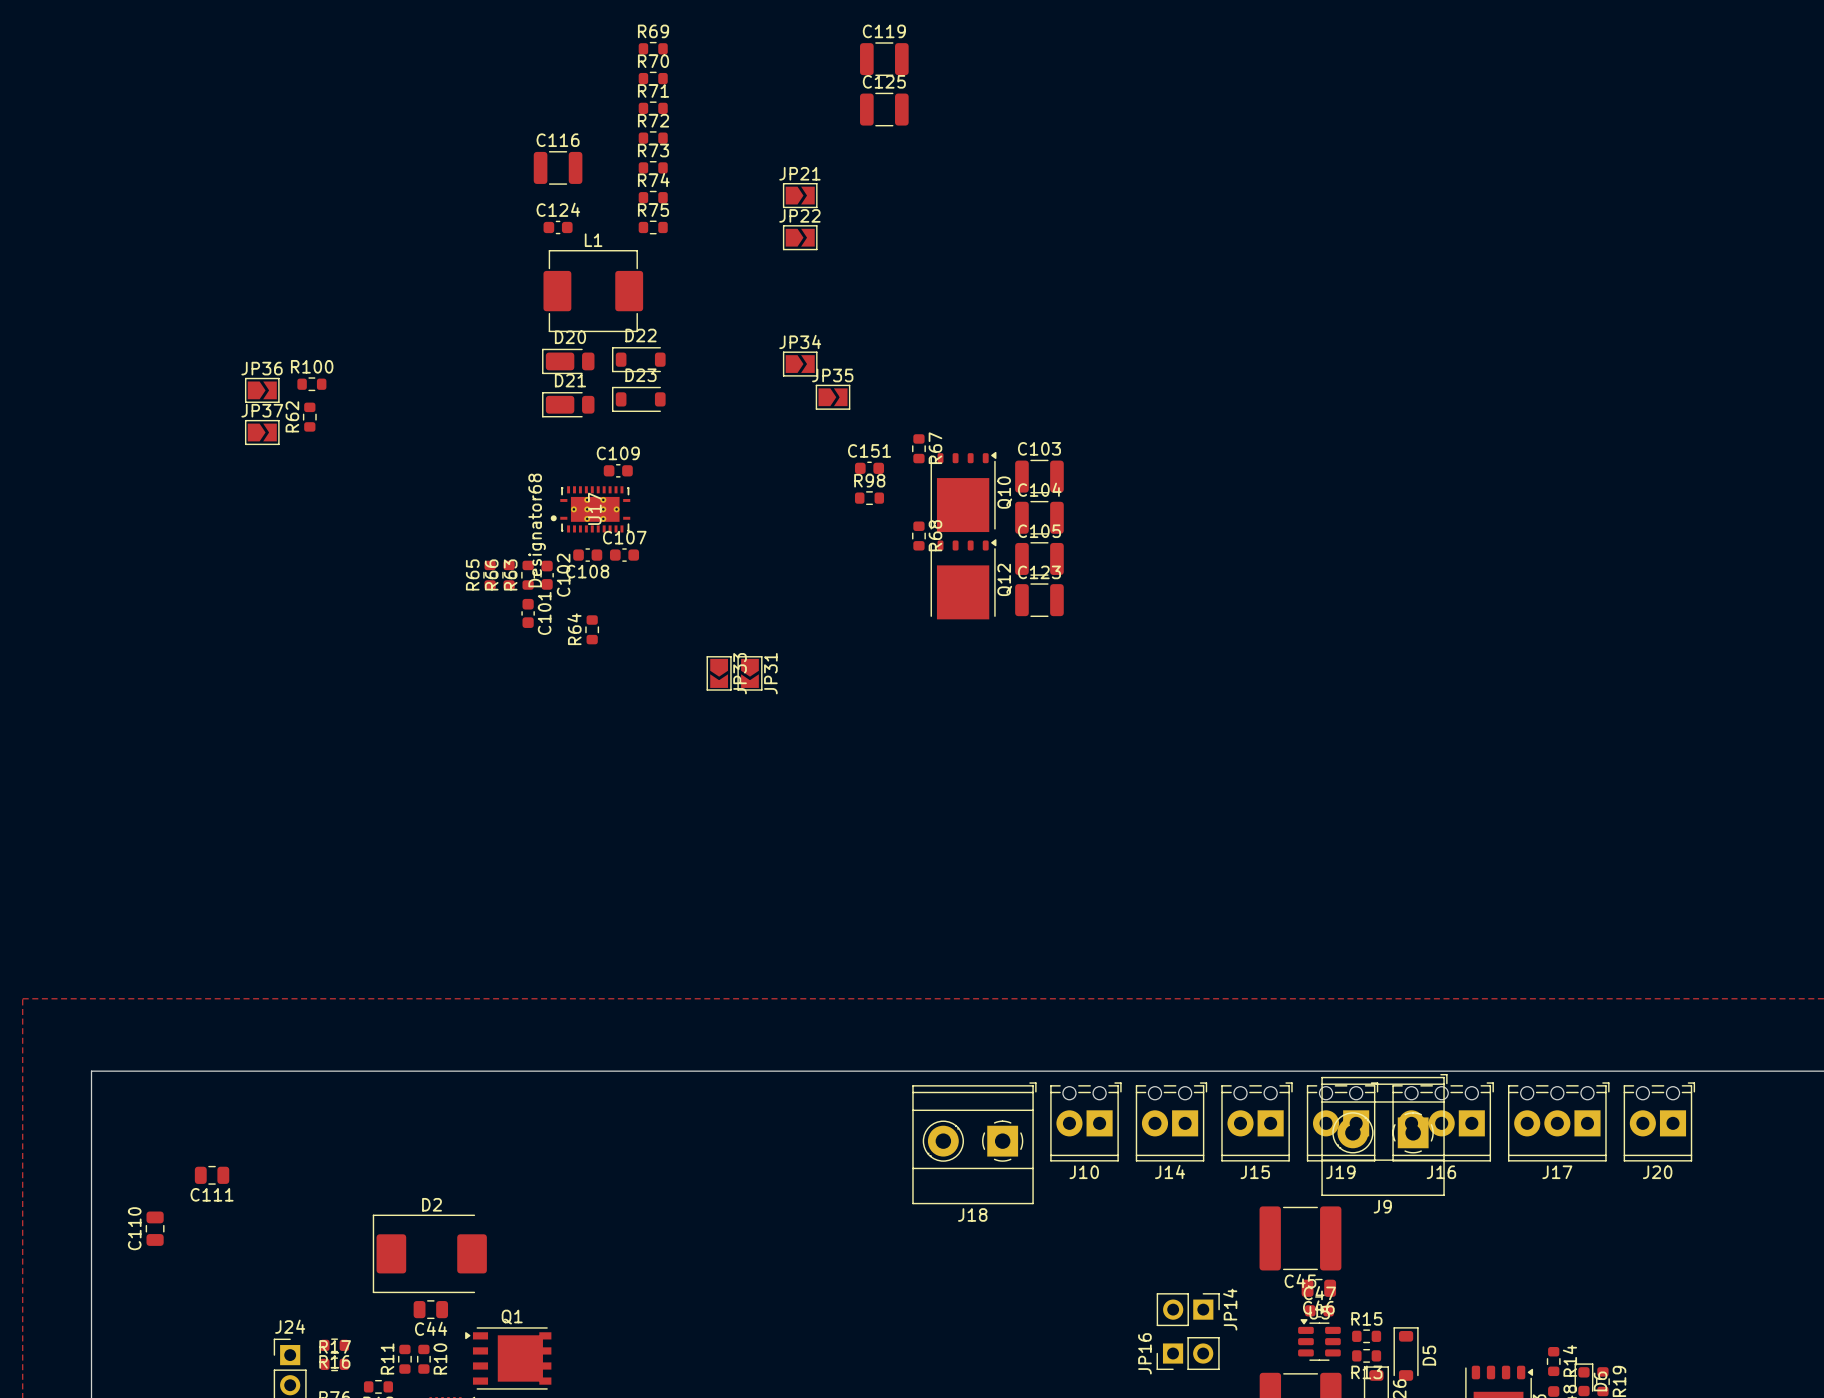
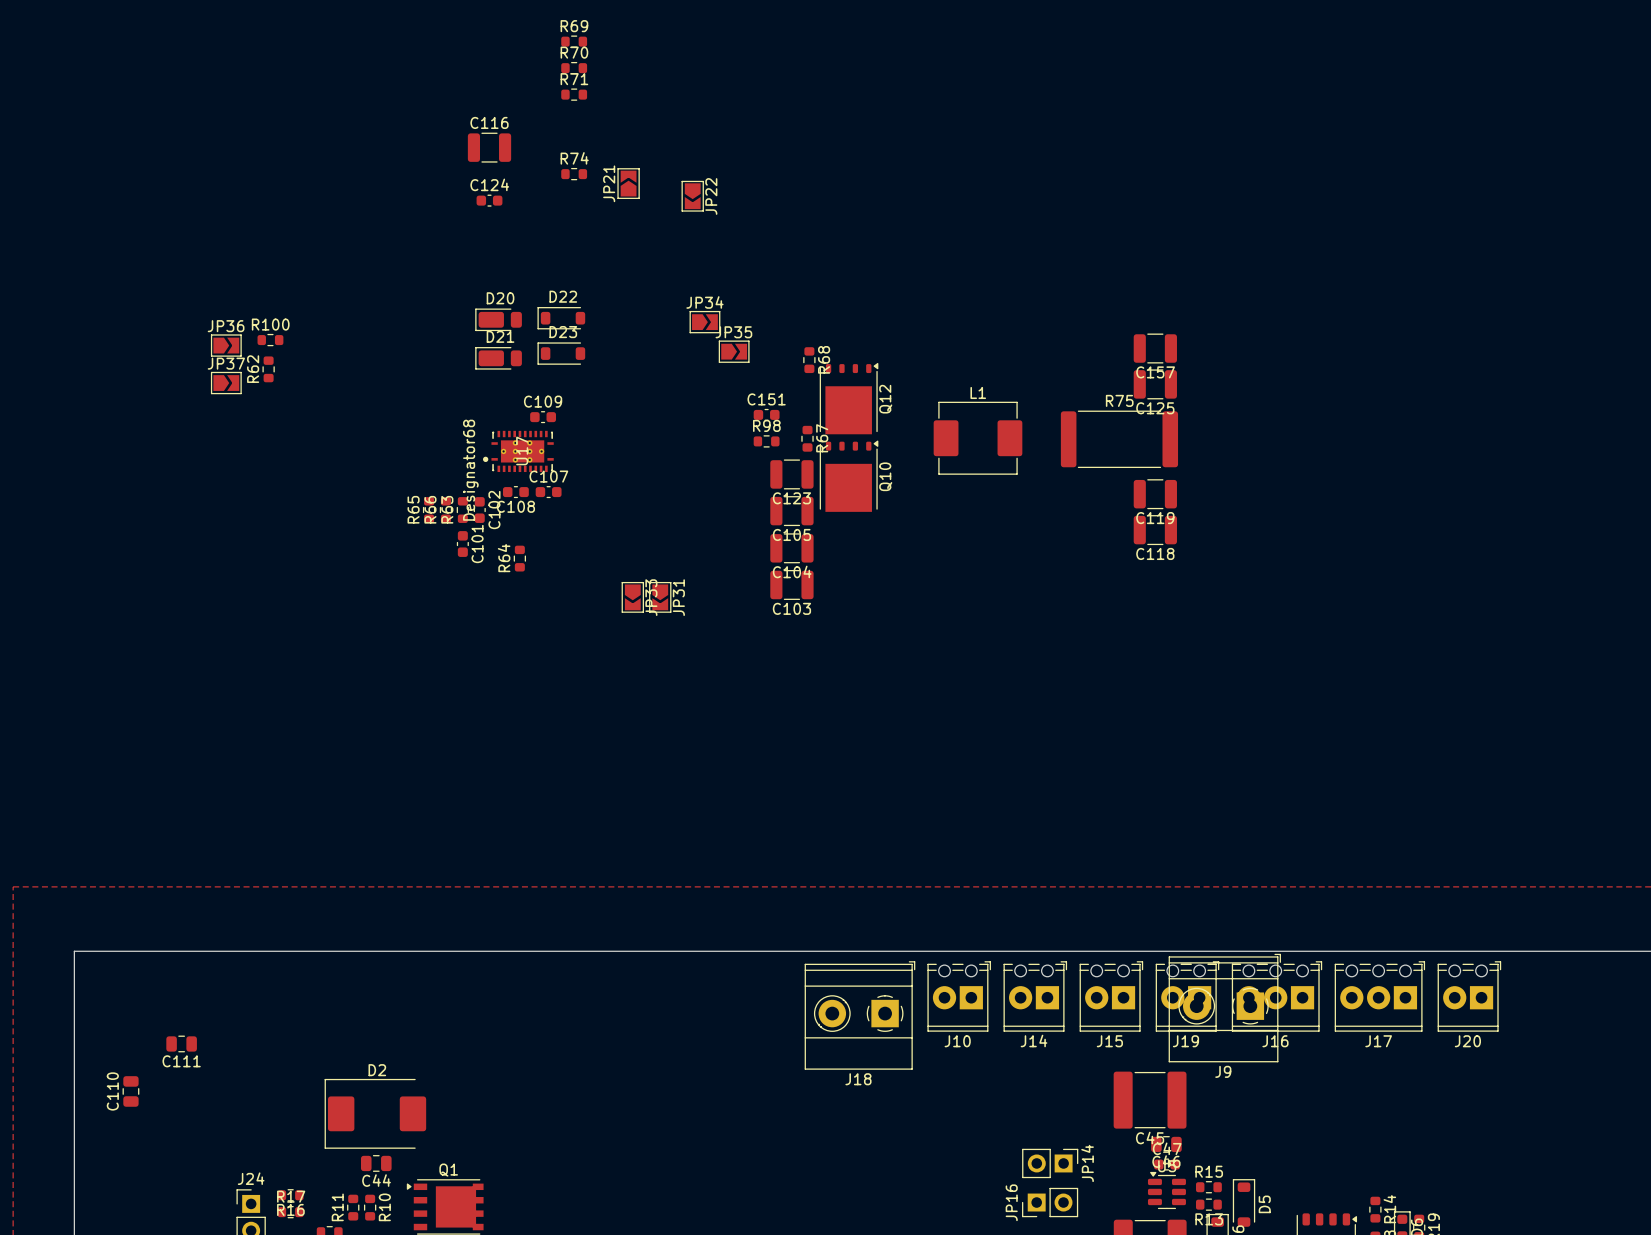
C119 name position: C119 (884, 31) -> C119 (1155, 518)
C119 position: (884, 59) -> (1155, 494)
C125 name position: C125 (884, 81) -> C125 (1155, 408)
C125 position: (884, 109) -> (1155, 384)
R72: (653, 138) -> none
R73: (653, 167) -> none
JP21 rotation: 0° (800, 195) -> 90° counterclockwise (628, 183)
JP21 position: (800, 195) -> (628, 183)
R75 name position: R75 (653, 210) -> R75 (1119, 400)
R75 footprint: [638, 220, 668, 235] -> [1060, 410, 1179, 469]
JP22 rotation: 0° (800, 237) -> 90° clockwise (692, 196)
L1 position: (593, 291) -> (978, 438)
C157: none -> (1155, 348)
R67 position: (918, 448) -> (807, 438)
C103 name position: C103 (1039, 448) -> C103 (791, 608)
C103 position: (1039, 476) -> (791, 584)
C104 name position: C104 (1039, 489) -> C104 (792, 571)
Q10 position: (963, 491) -> (849, 476)
C104 position: (1039, 517) -> (791, 548)
C105 name position: C105 (1039, 531) -> C105 (791, 534)
R68 position: (918, 536) -> (809, 360)
C105 position: (1039, 558) -> (791, 511)
C123 name position: C123 (1039, 572) -> C123 (791, 498)
Q12 position: (963, 579) -> (849, 398)
C118: none -> (1155, 530)
C123 position: (1039, 600) -> (791, 474)

